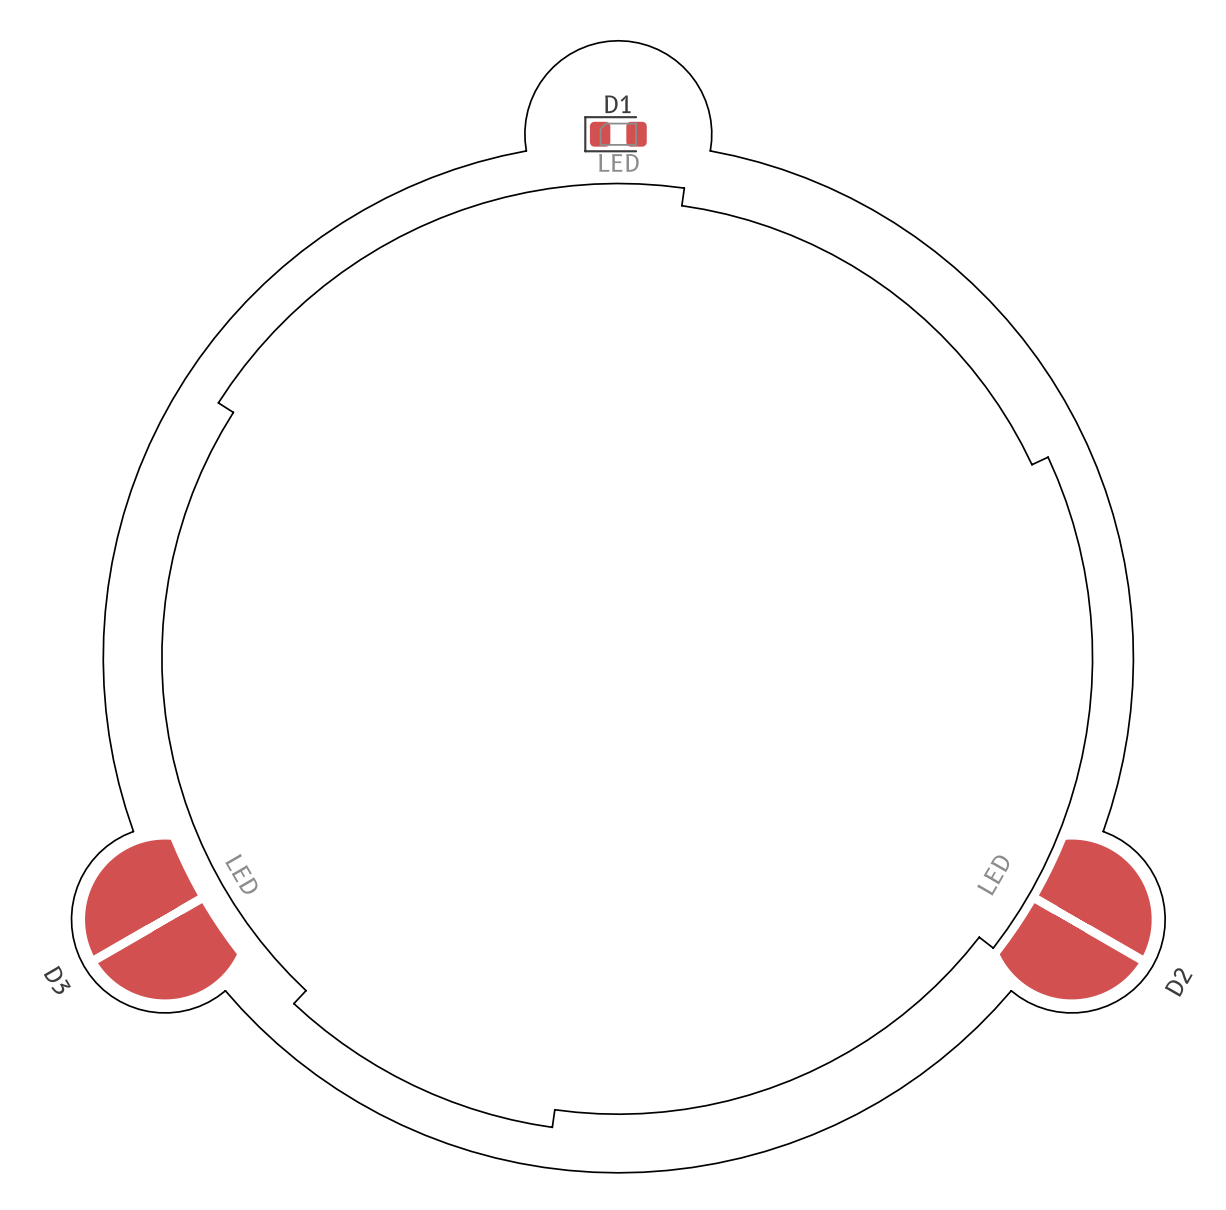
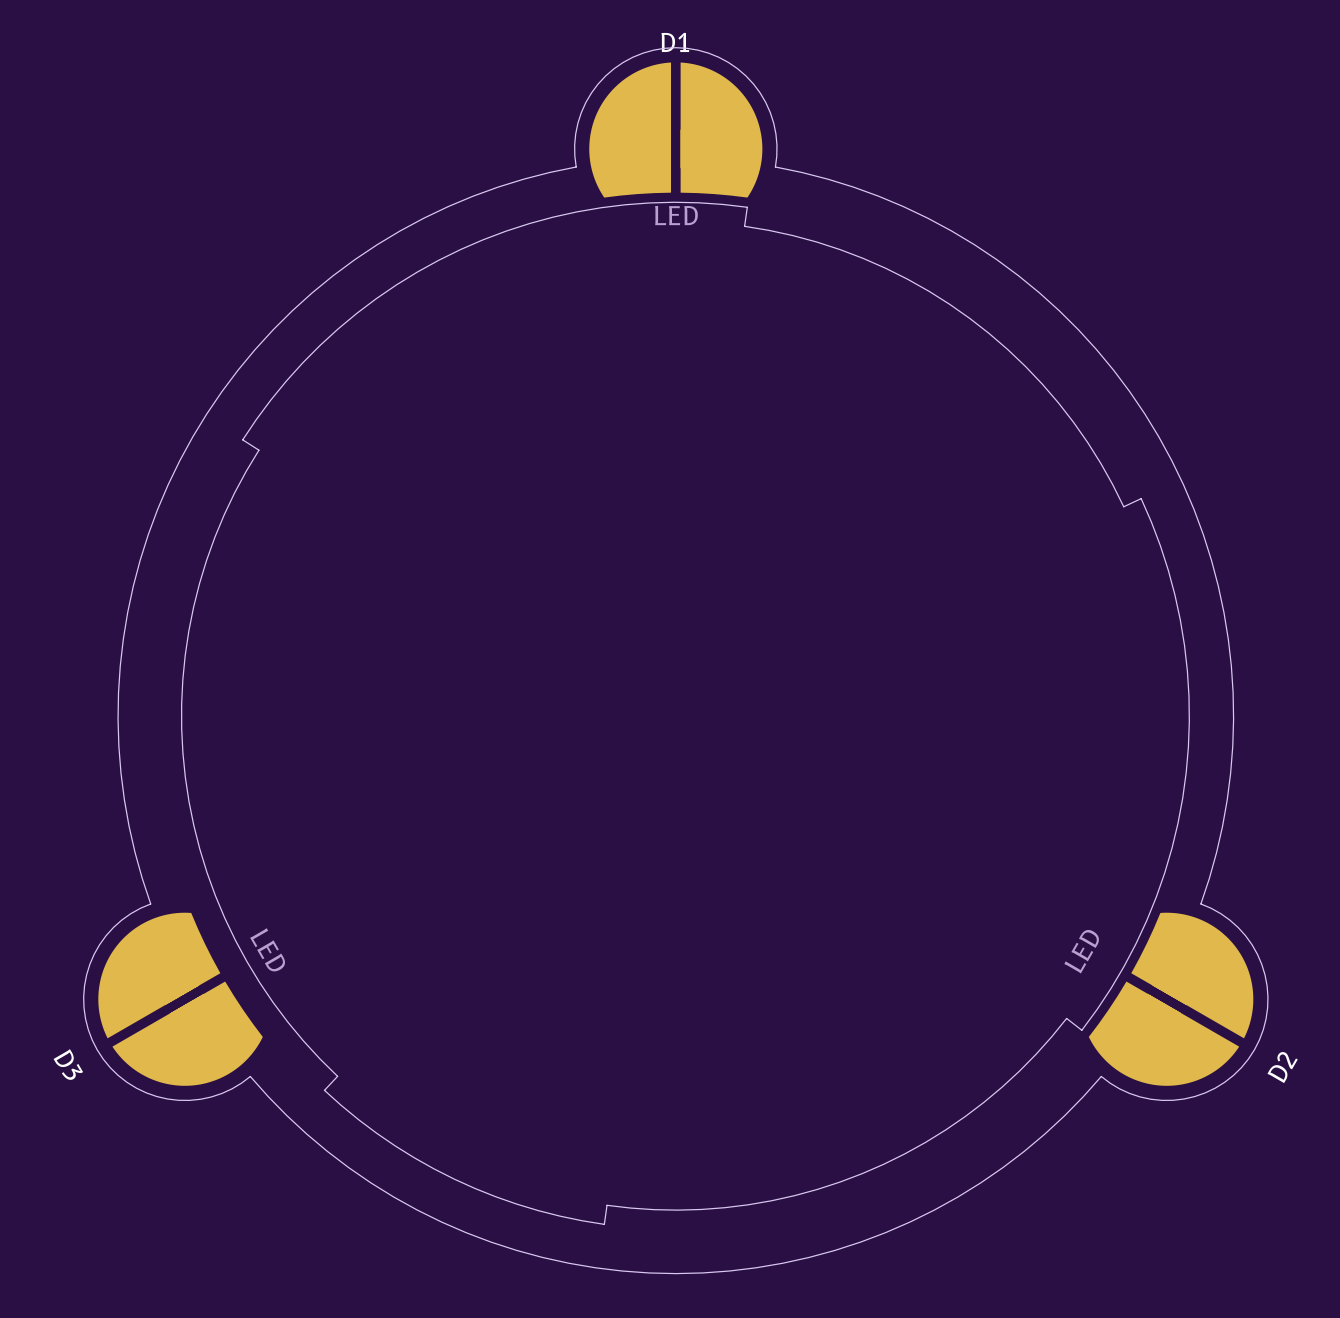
D1 name position: D1 (617, 104) -> D1 (675, 42)
D1 footprint: [584, 116, 647, 153] -> [589, 62, 763, 198]
D1 value position: LED (618, 162) -> LED (676, 215)

